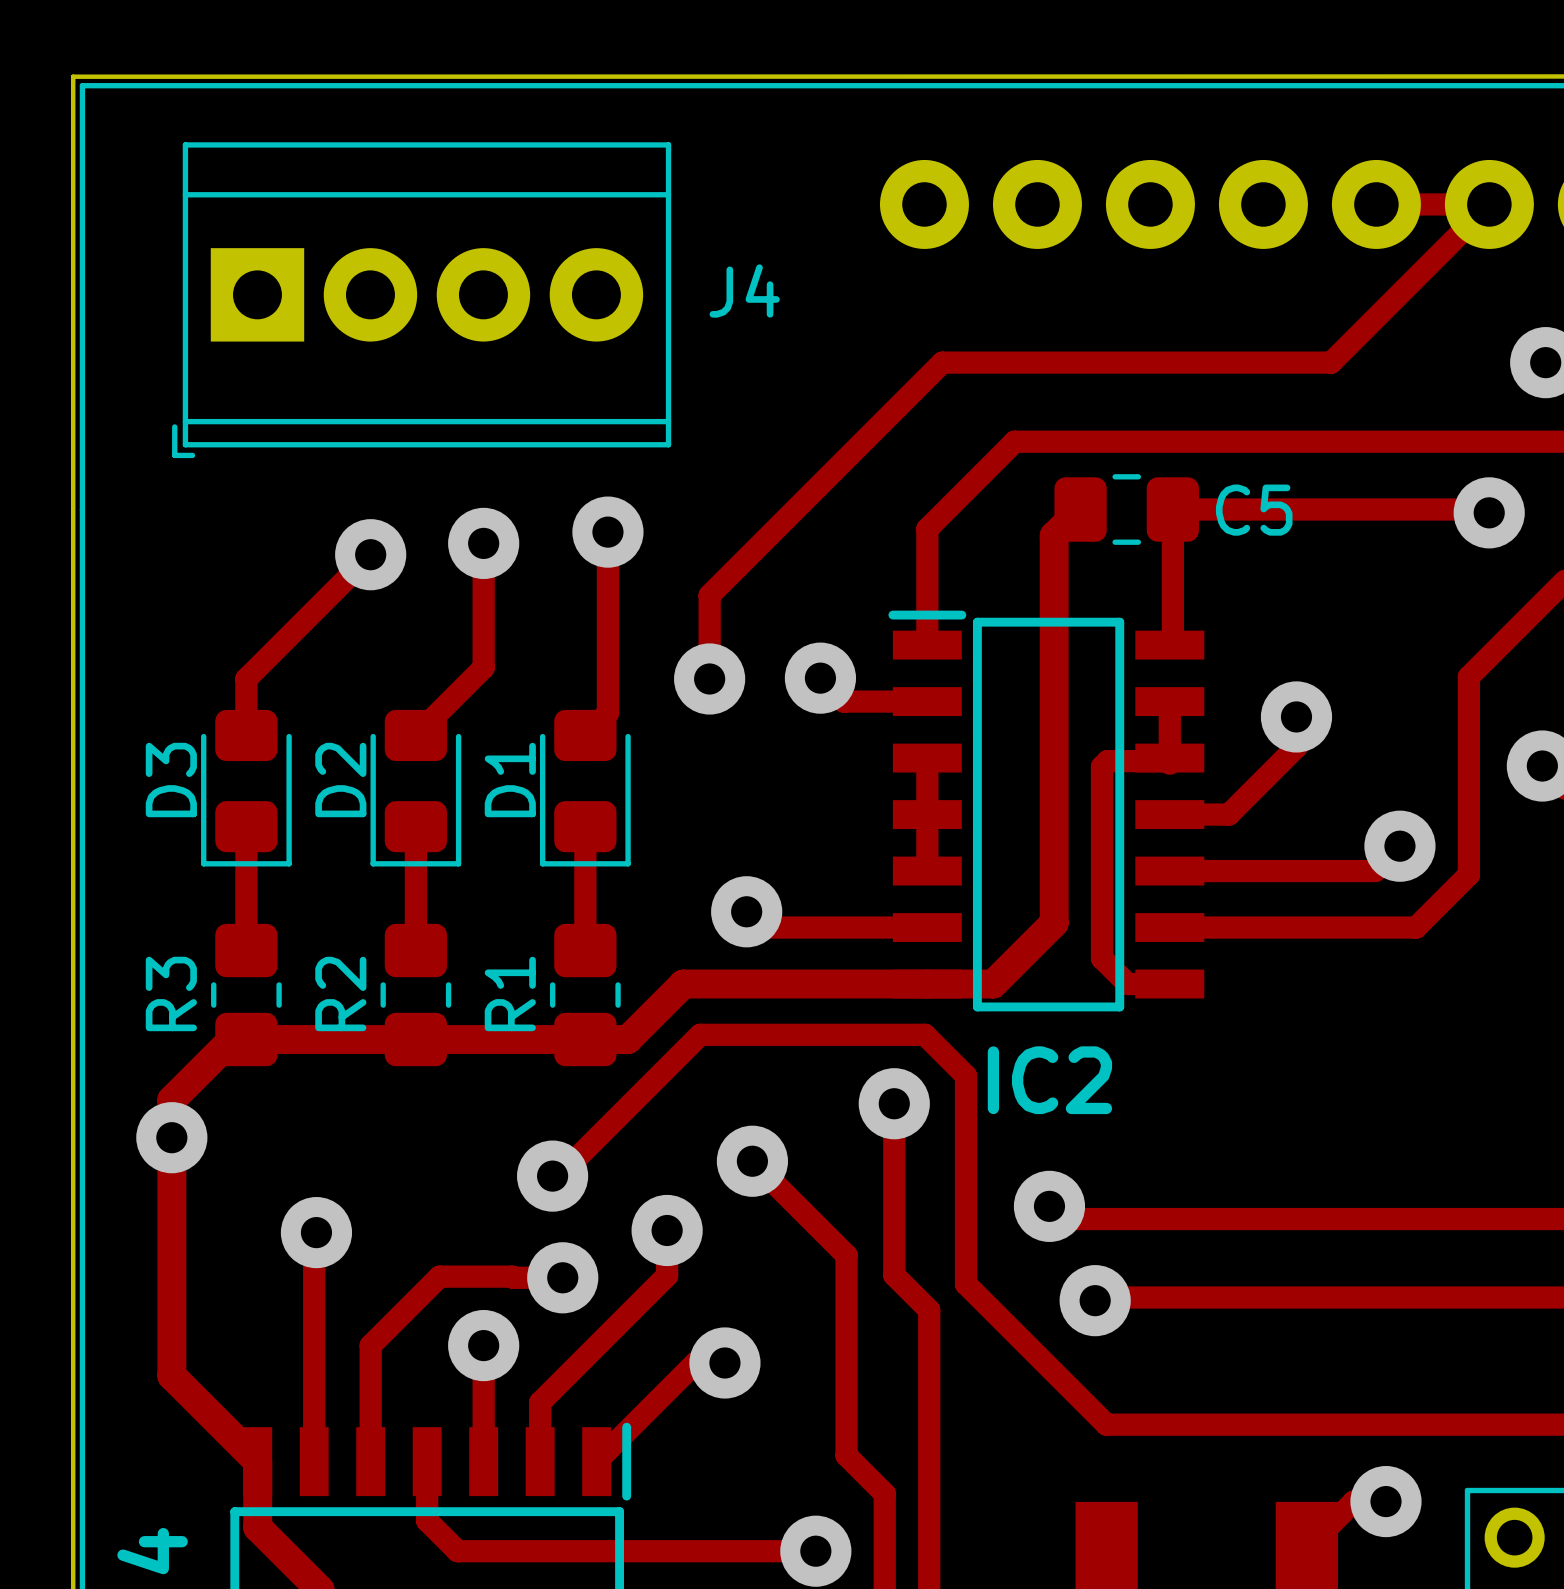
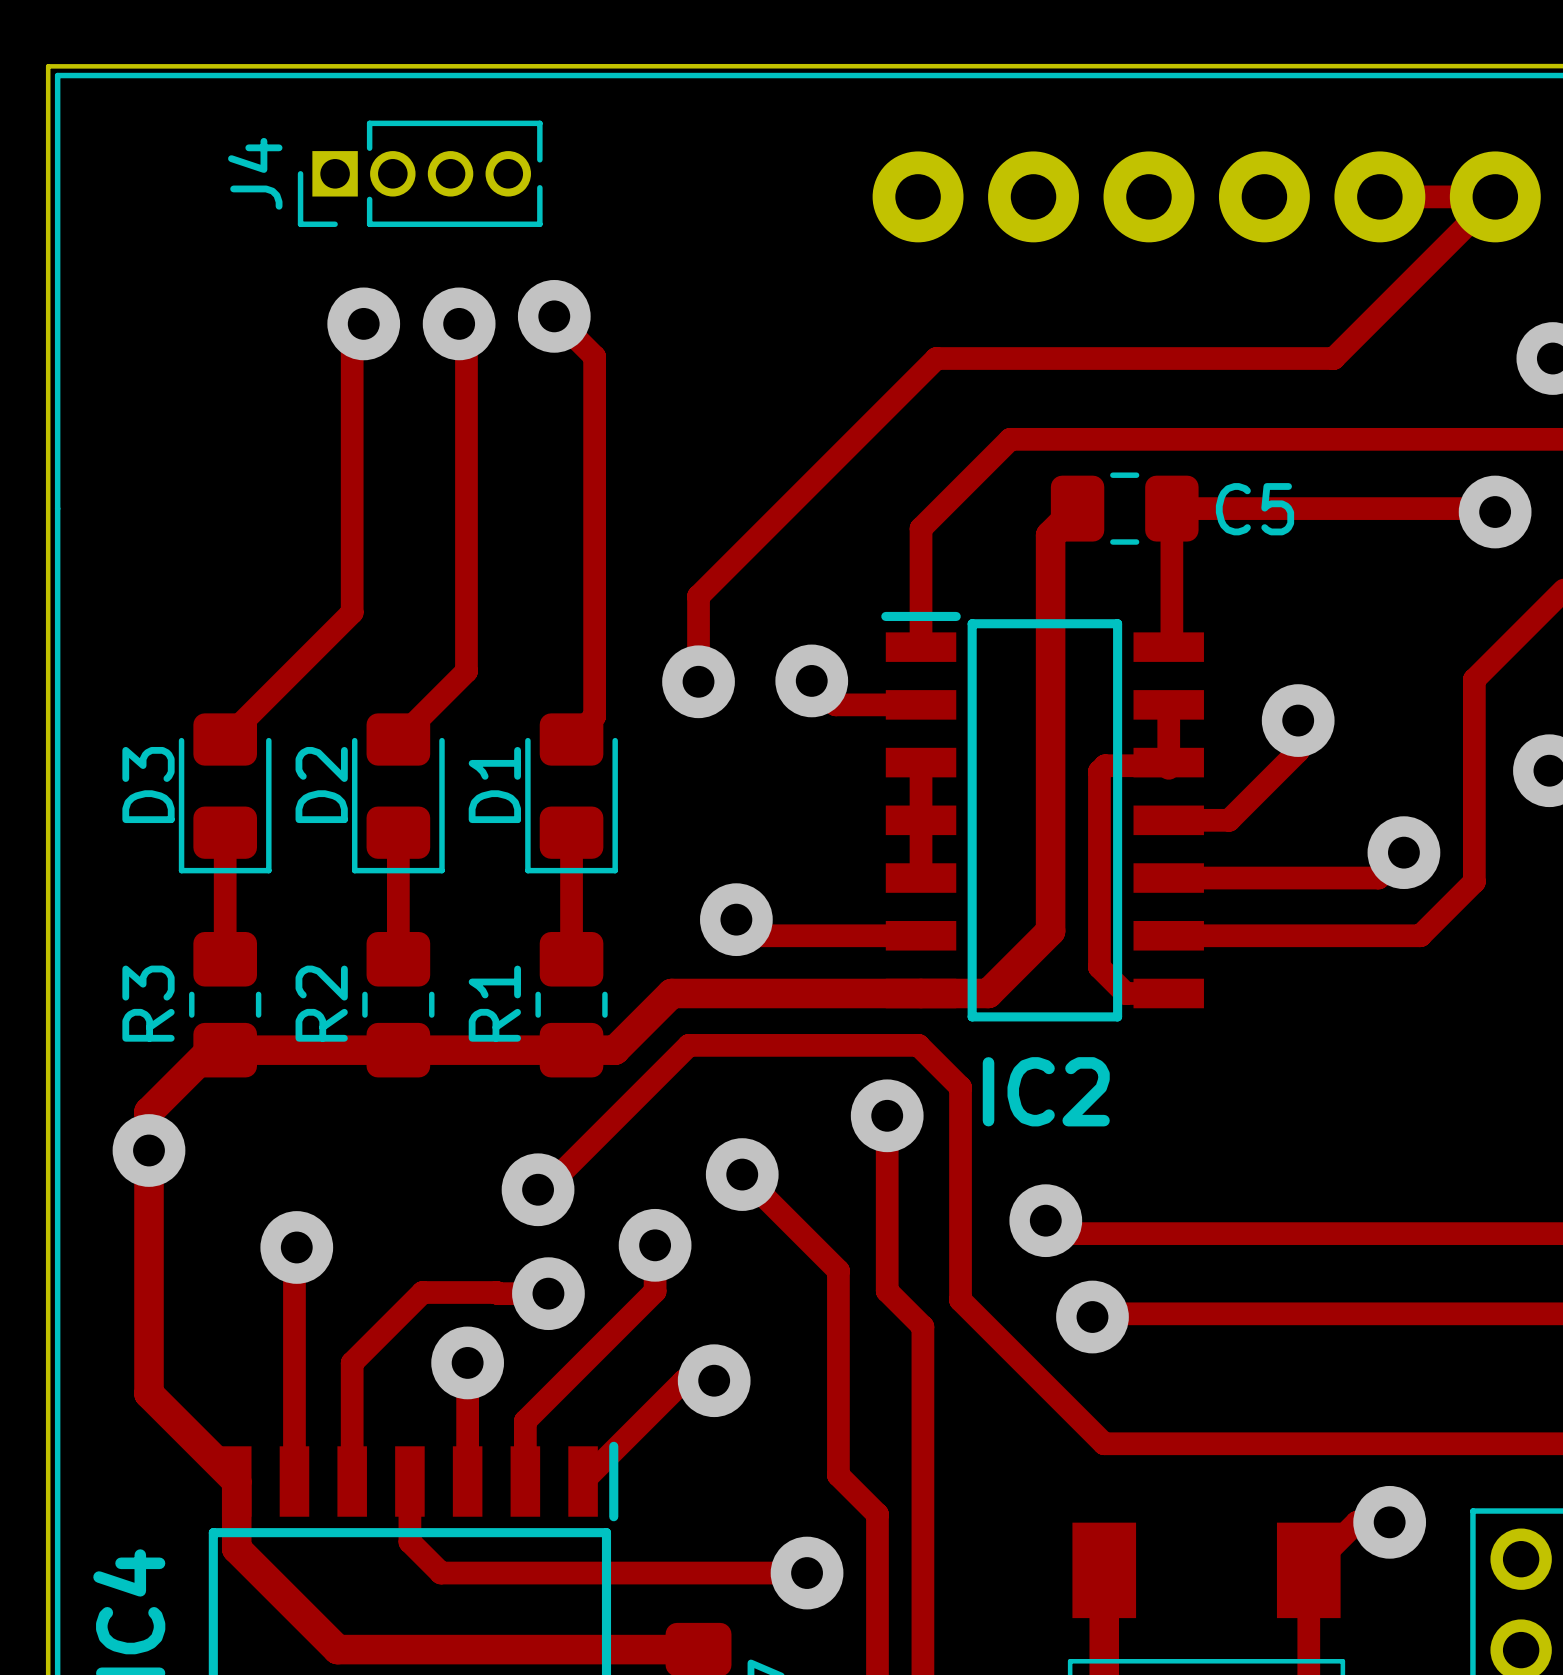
J4 footprint: [172, 142, 672, 459] -> [297, 120, 543, 227]
J4 name position: J4 (744, 290) -> J4 (255, 173)
track: none -> (554, 316) (594, 356) (594, 531)
via: none -> (554, 316)
via: none -> (363, 323)
via: none -> (459, 323)
via: (607, 532) -> none
track: (483, 543) (482, 668) -> (459, 323) (466, 331) (466, 671)
via: (483, 543) -> none
track: (370, 554) (246, 678) (246, 735) -> (352, 335) (352, 612) (225, 739)
via: (370, 554) -> none

